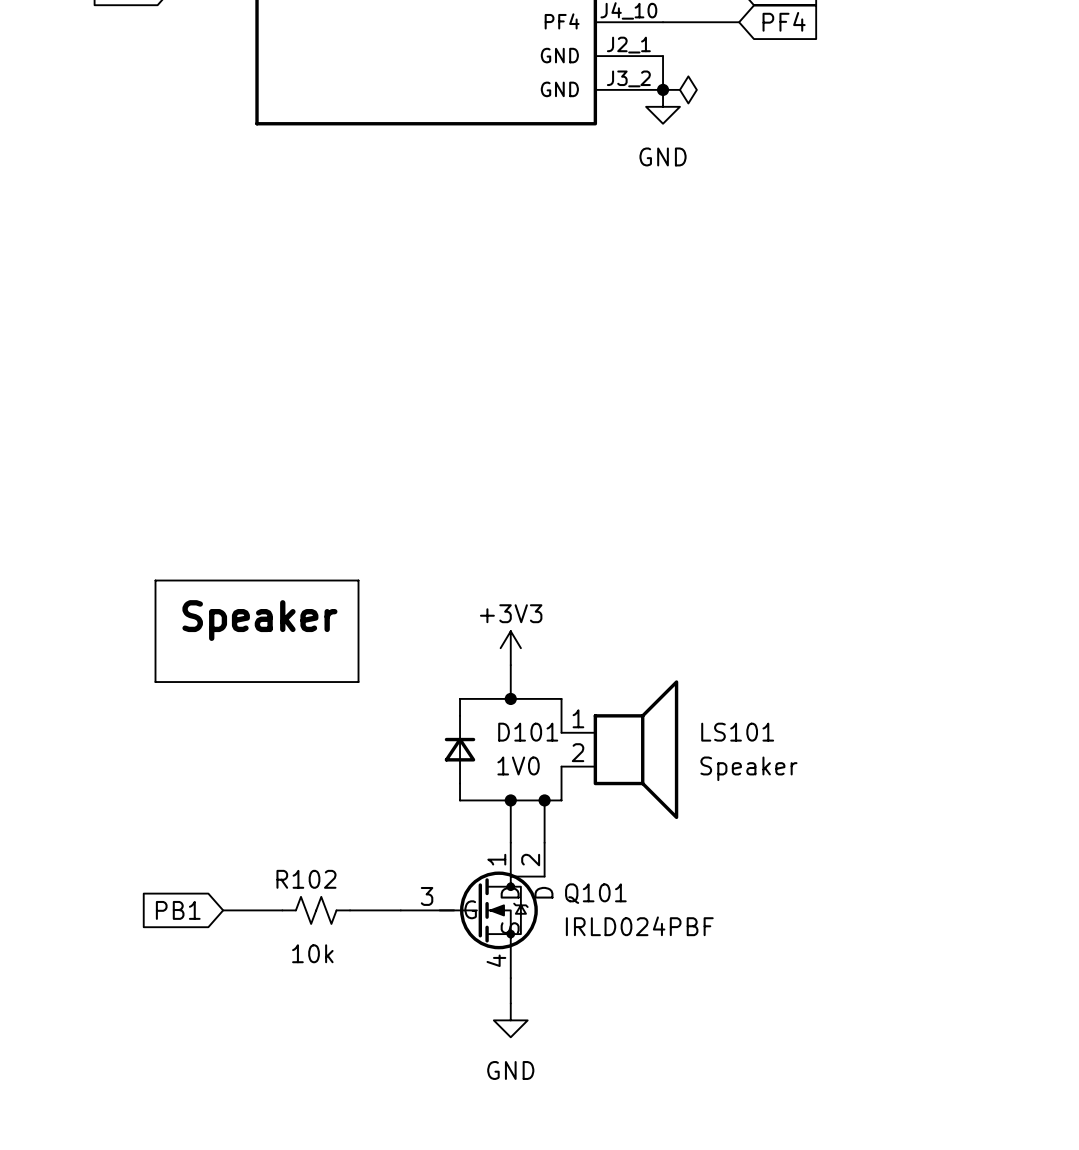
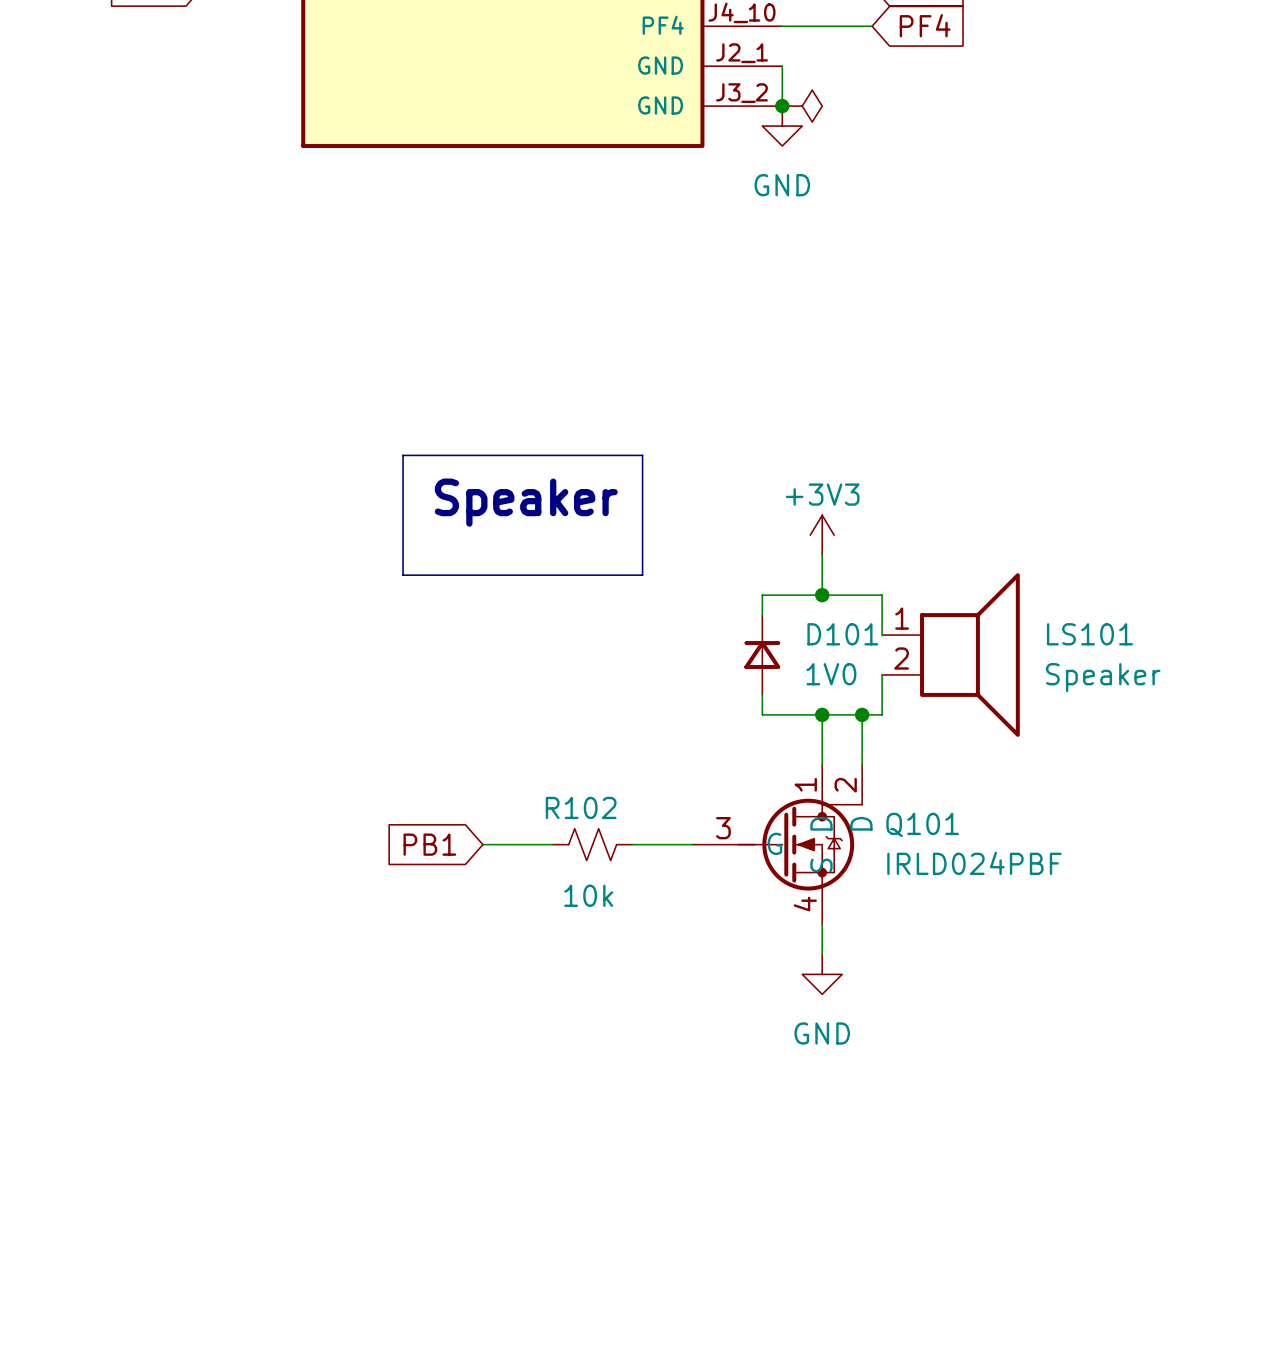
junction: none -> (822, 595)
line: (155, 580) (358, 580) (358, 682) (155, 682) (155, 580) -> (403, 455) (642, 455) (642, 575) (403, 575) (403, 455)
junction: none -> (822, 714)
junction: none -> (862, 714)
text position: Speaker (259, 620) -> Speaker (526, 502)
power symbol position: +3V3 (510, 648) -> +3V3 (822, 535)
wire: (510, 665) (510, 698) -> (822, 555) (822, 595)
junction: (510, 698) -> none
wire: (460, 715) (460, 698) (561, 698) (561, 732) -> (762, 615) (762, 595) (882, 595) (882, 635)
D101 position: (460, 749) -> (762, 655)
LS101 position: (619, 749) -> (950, 655)
wire: (561, 766) (561, 800) (460, 800) (460, 783) -> (882, 674) (882, 714) (762, 714) (762, 694)
wire: (510, 800) (510, 842) -> (822, 714) (822, 764)
junction: (510, 800) -> none
wire: (544, 800) (544, 842) -> (862, 714) (862, 764)
junction: (544, 800) -> none
global label position: PB1 (178, 910) -> PB1 (429, 844)
wire: (223, 910) (282, 910) -> (482, 844) (552, 844)
R102 position: (316, 910) -> (592, 844)
wire: (350, 910) (400, 910) -> (632, 844) (692, 844)
Q101 position: (472, 910) -> (777, 844)
wire: (510, 978) (510, 1003) -> (822, 924) (822, 954)
power symbol position: GND (510, 1020) -> GND (822, 974)

